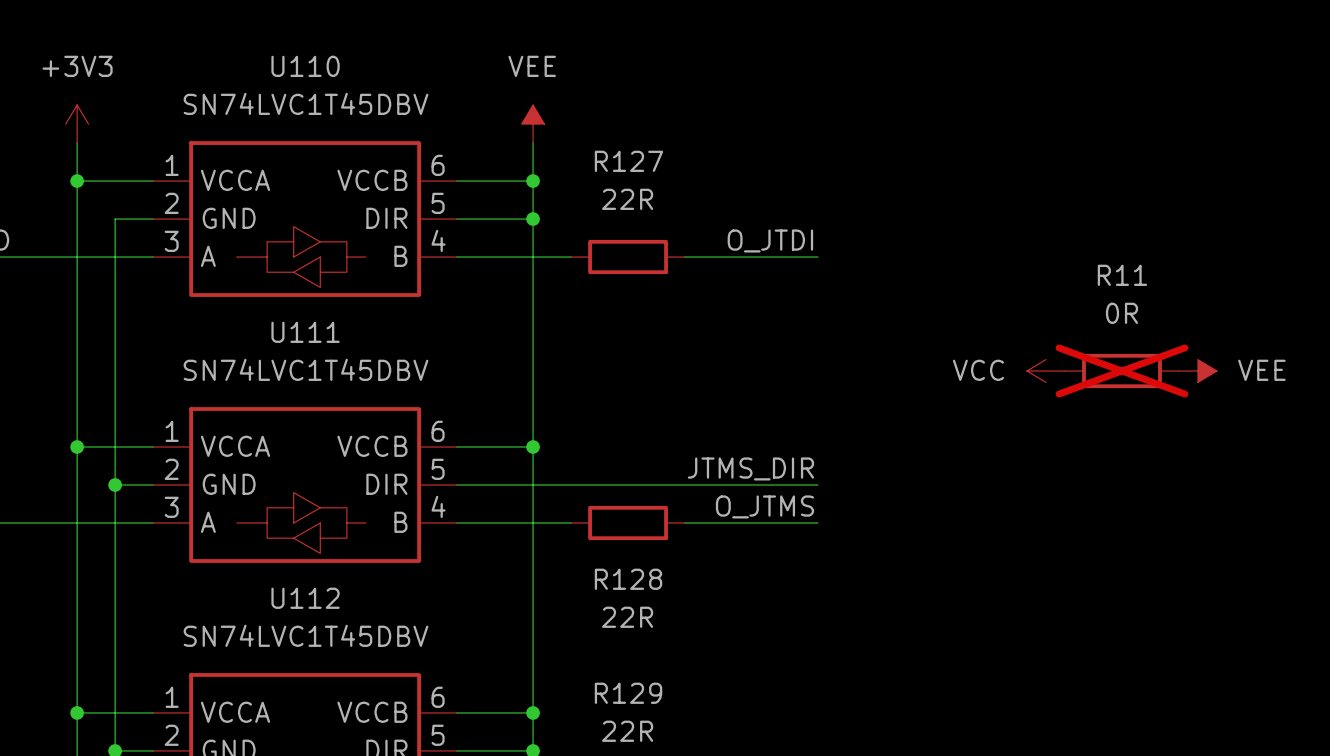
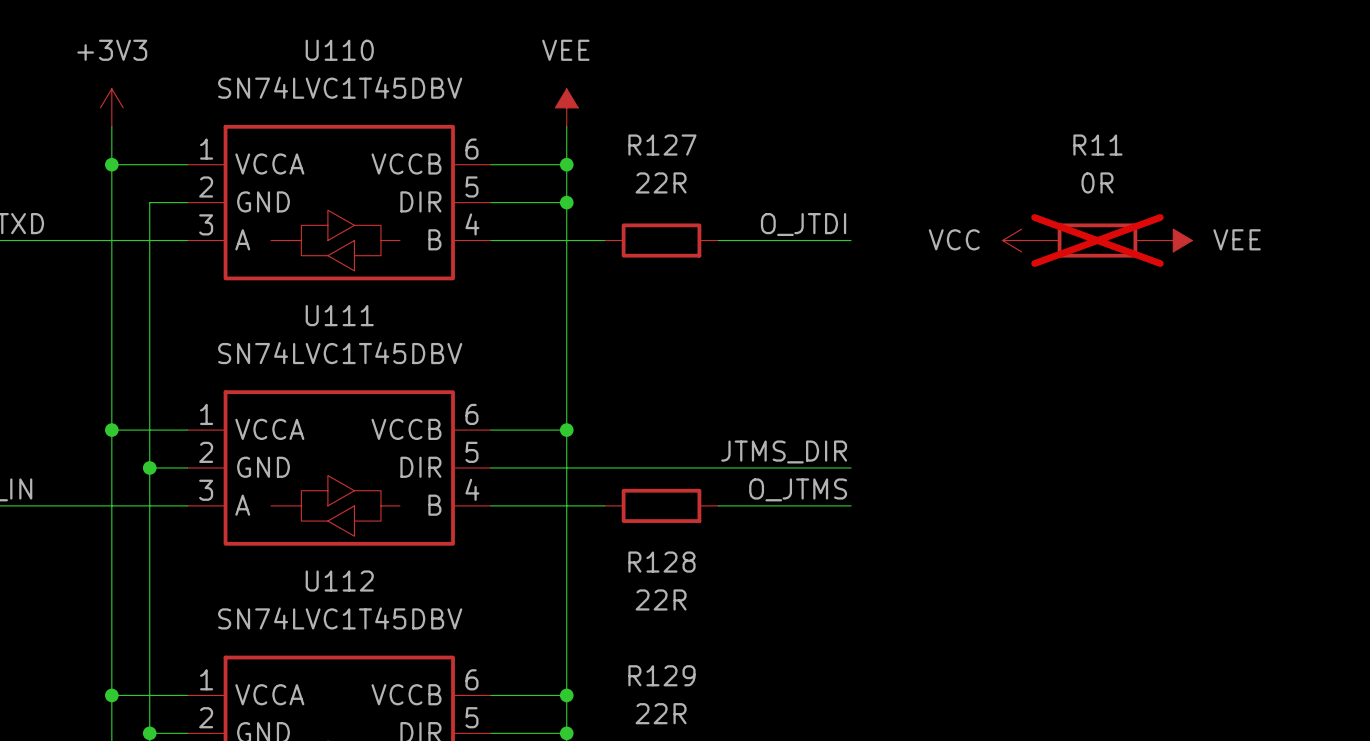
power symbol position: VCC (1045, 371) -> VCC (1021, 240)
R11 position: (1121, 371) -> (1097, 240)
power symbol position: VEE (1197, 371) -> VEE (1173, 240)

